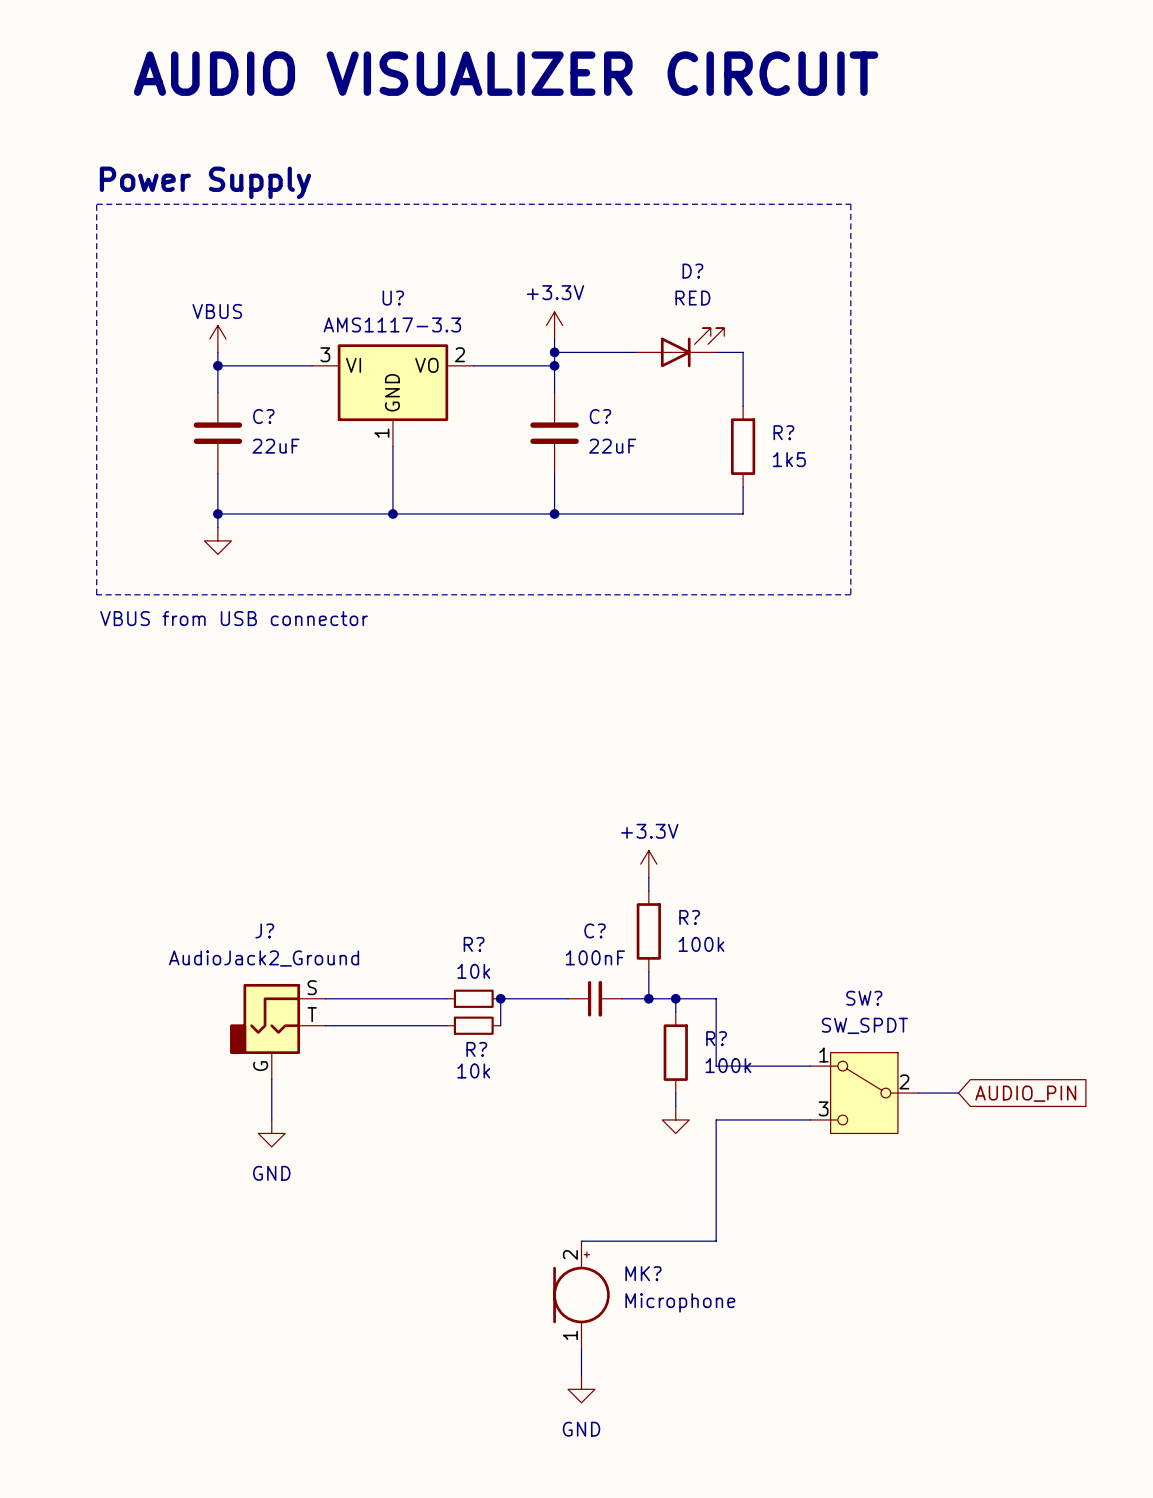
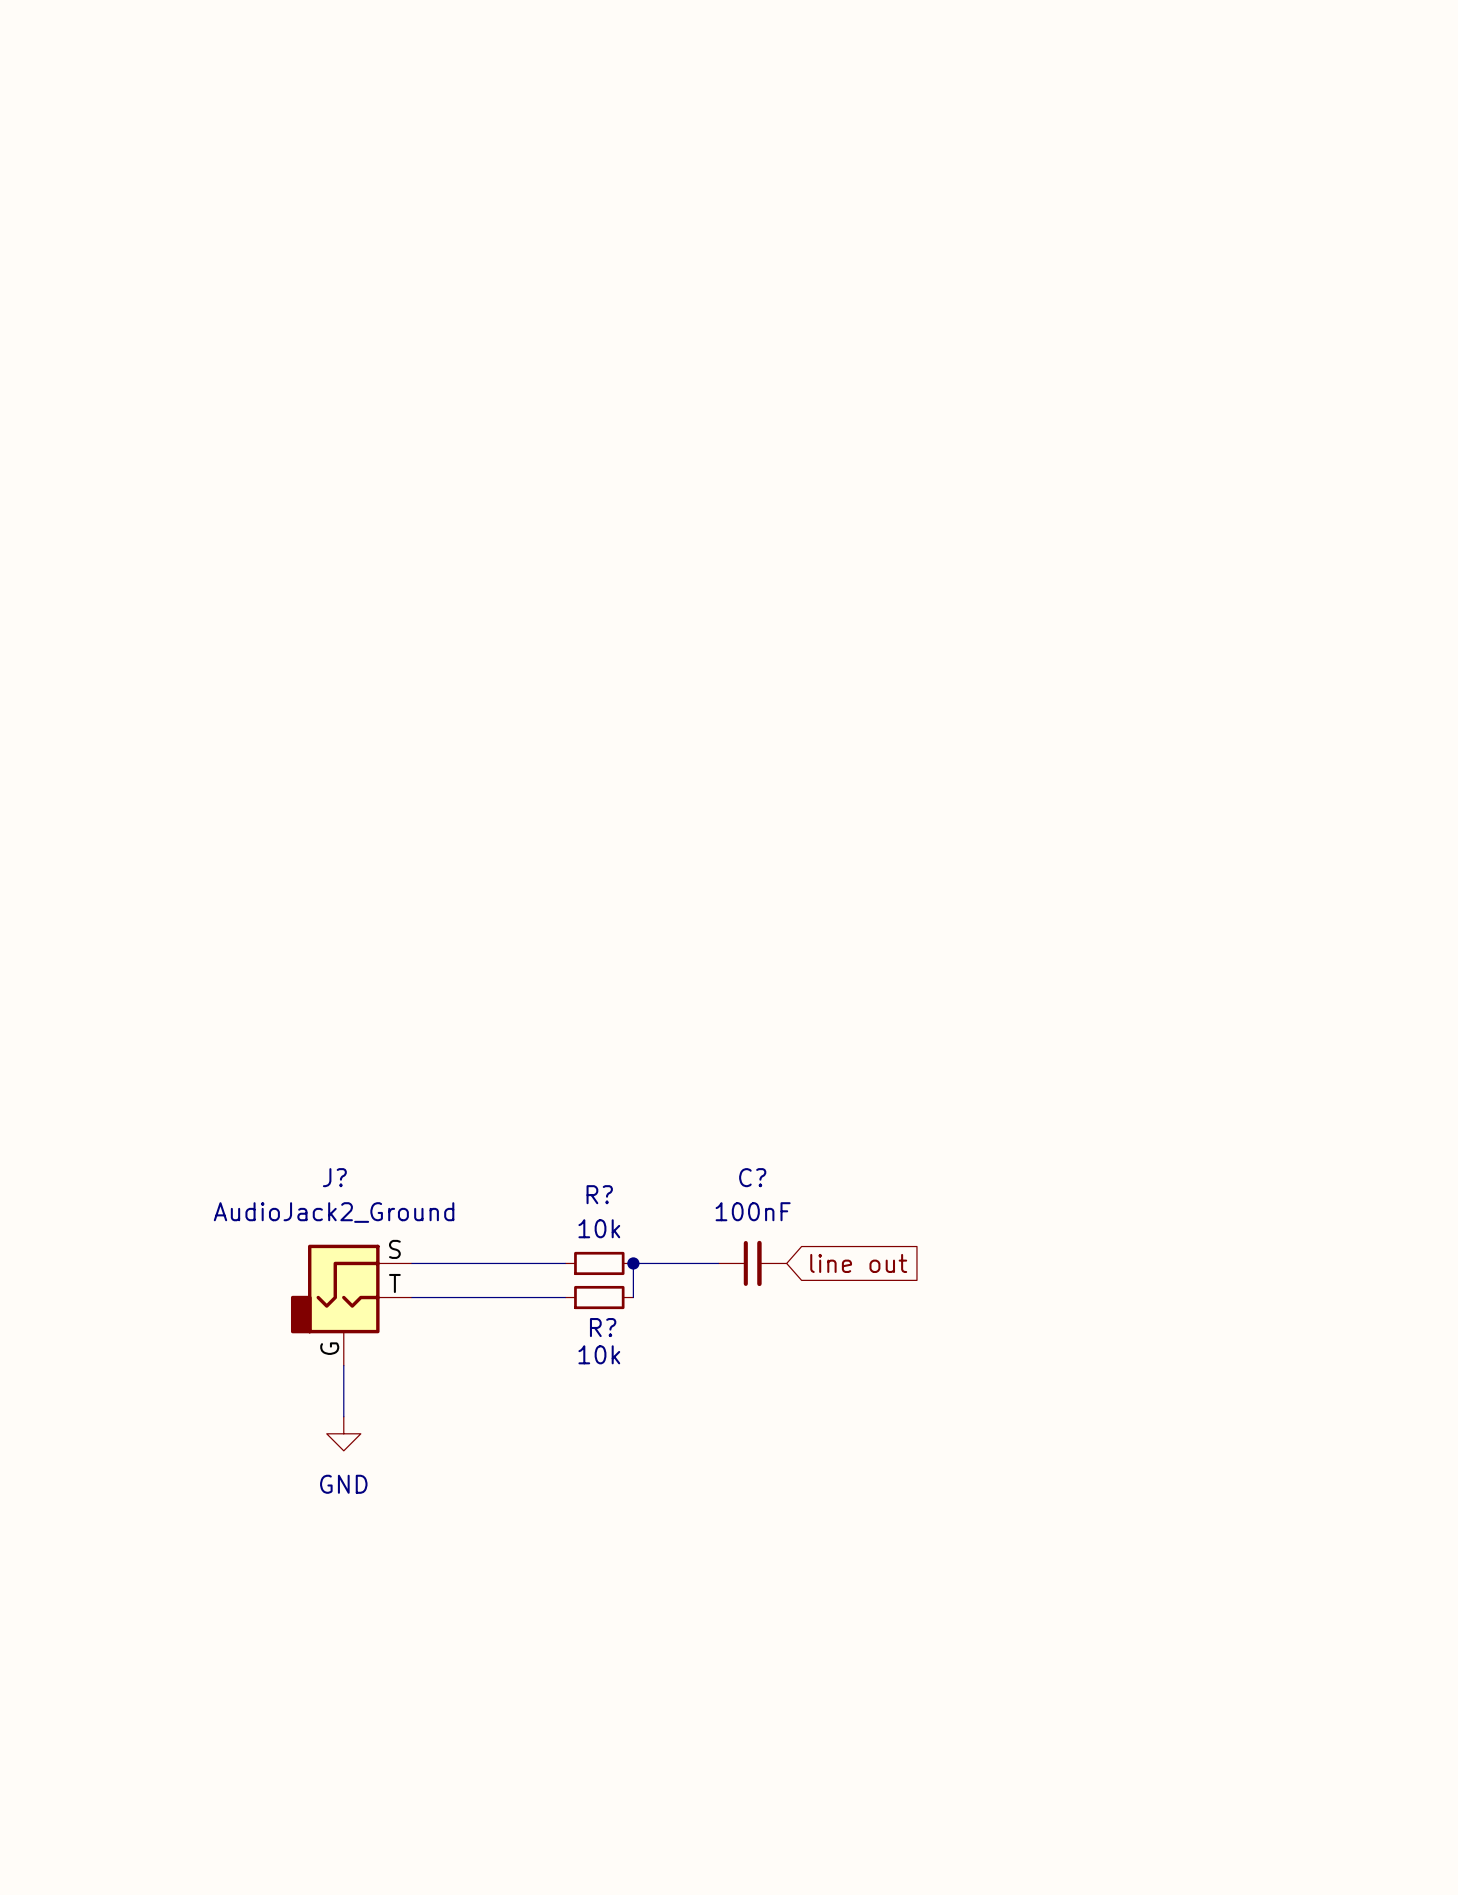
text: AUDIO VISUALIZER CIRCUIT (506, 73) -> none
text: Power Supply (205, 182) -> none
line: (96, 204) (850, 204) (850, 594) (96, 594) (96, 204) -> none
power symbol: +3.3V (554, 325) -> none
power symbol: VBUS (217, 338) -> none
wire: (554, 338) (554, 392) -> none
D?: RED (679, 347) -> none
wire: (217, 352) (217, 392) -> none
wire: (554, 352) (635, 352) -> none
junction: (554, 352) -> none
wire: (716, 352) (743, 352) (743, 406) -> none
wire: (217, 365) (312, 365) -> none
junction: (217, 365) -> none
wire: (473, 365) (554, 365) -> none
junction: (554, 365) -> none
U?: AMS1117-3.3 (392, 395) -> none
C?: 22uF (217, 433) -> none
C?: 22uF (554, 433) -> none
wire: (392, 446) (392, 513) -> none
R?: 1k5 (743, 446) -> none
wire: (217, 473) (217, 527) -> none
wire: (554, 473) (554, 513) -> none
wire: (743, 487) (743, 513) (217, 513) -> none
junction: (217, 513) -> none
junction: (392, 513) -> none
junction: (554, 513) -> none
power symbol: (217, 540) -> none
text: VBUS from USB connector (234, 618) -> none
power symbol: +3.3V (648, 864) -> none
wire: (648, 877) (648, 891) -> none
R?: 100k (648, 931) -> none
wire: (648, 971) (648, 998) -> none
wire: (621, 998) (716, 998) (716, 1066) (810, 1066) -> none
junction: (648, 998) -> none
wire: (675, 998) (675, 1012) -> none
junction: (675, 998) -> none
global label: none -> line out (858, 1263)
R?: 100k (675, 1052) -> none
wire: (675, 1093) (675, 1106) -> none
SW?: SW_SPDT (864, 1093) -> none
wire: (918, 1093) (958, 1093) -> none
global label: AUDIO_PIN (1025, 1093) -> none
power symbol: (675, 1119) -> none
wire: (810, 1119) (716, 1119) (716, 1241) (581, 1241) -> none
MK?: Microphone (581, 1295) -> none
wire: (581, 1348) (581, 1375) -> none
power symbol: GND (581, 1389) -> none

